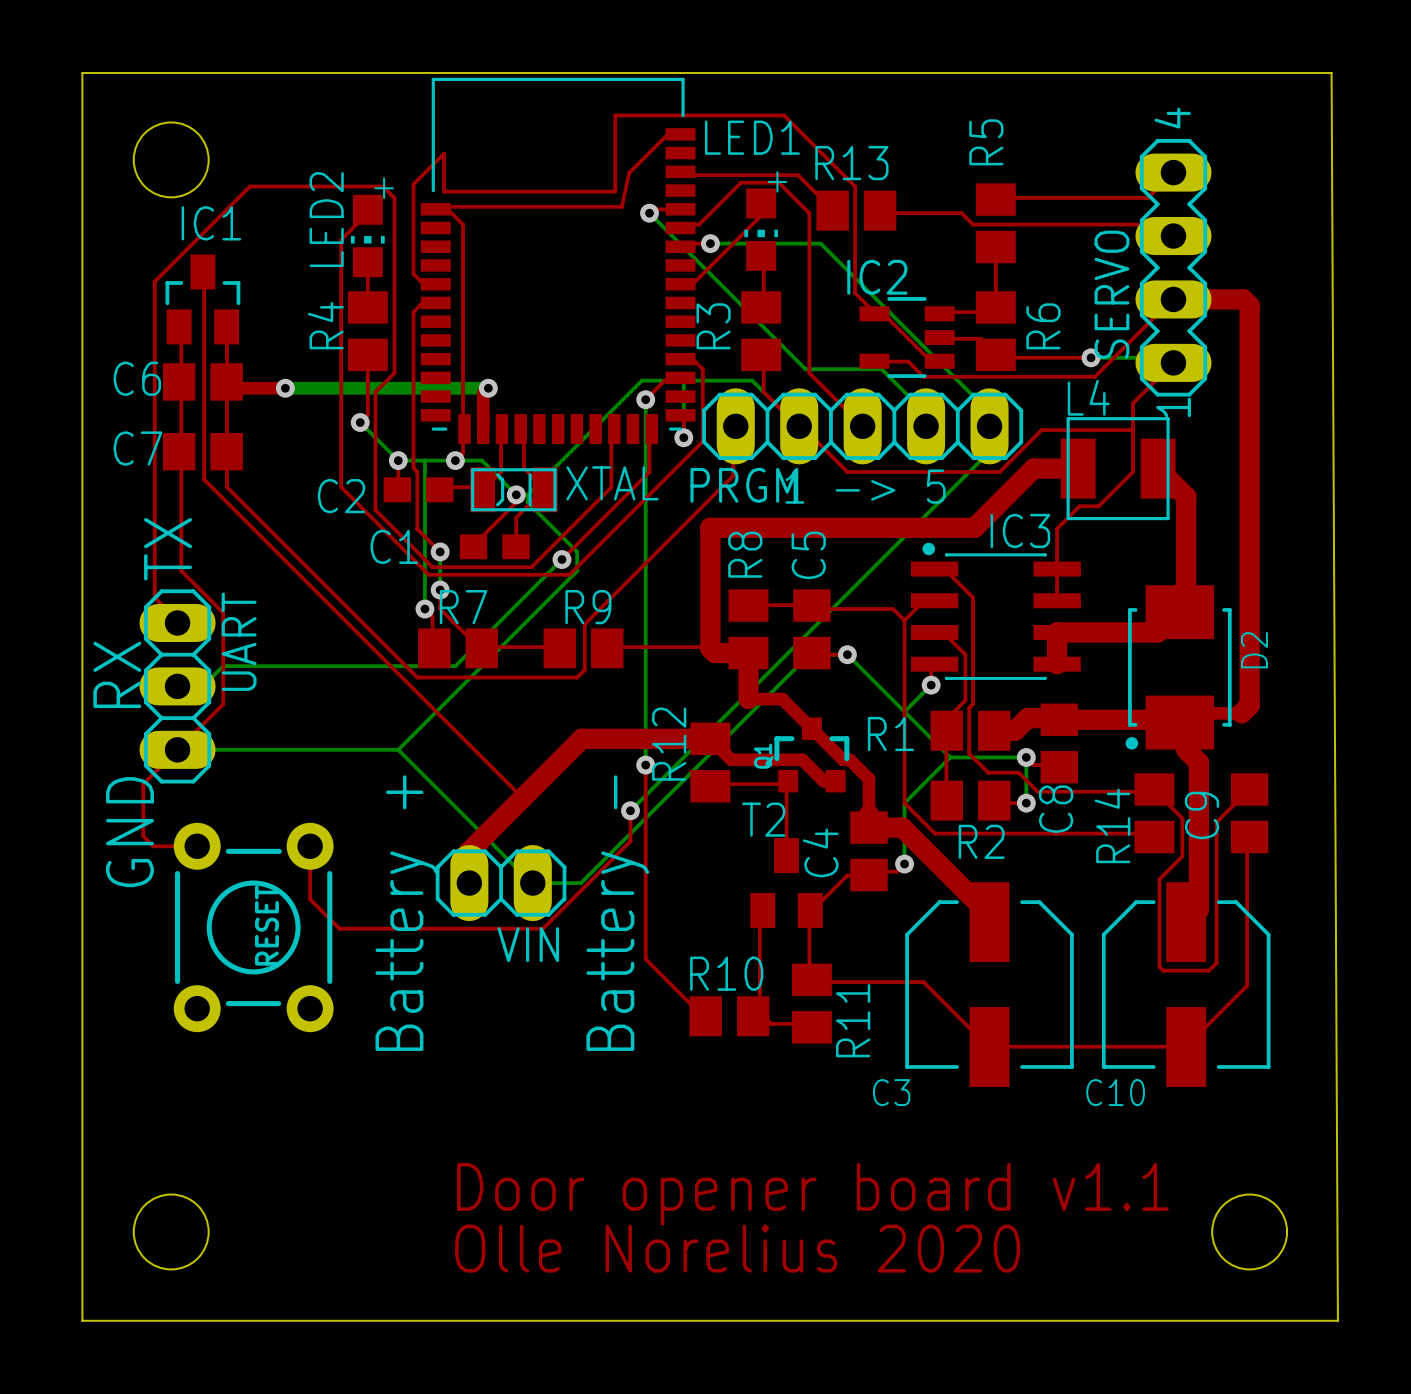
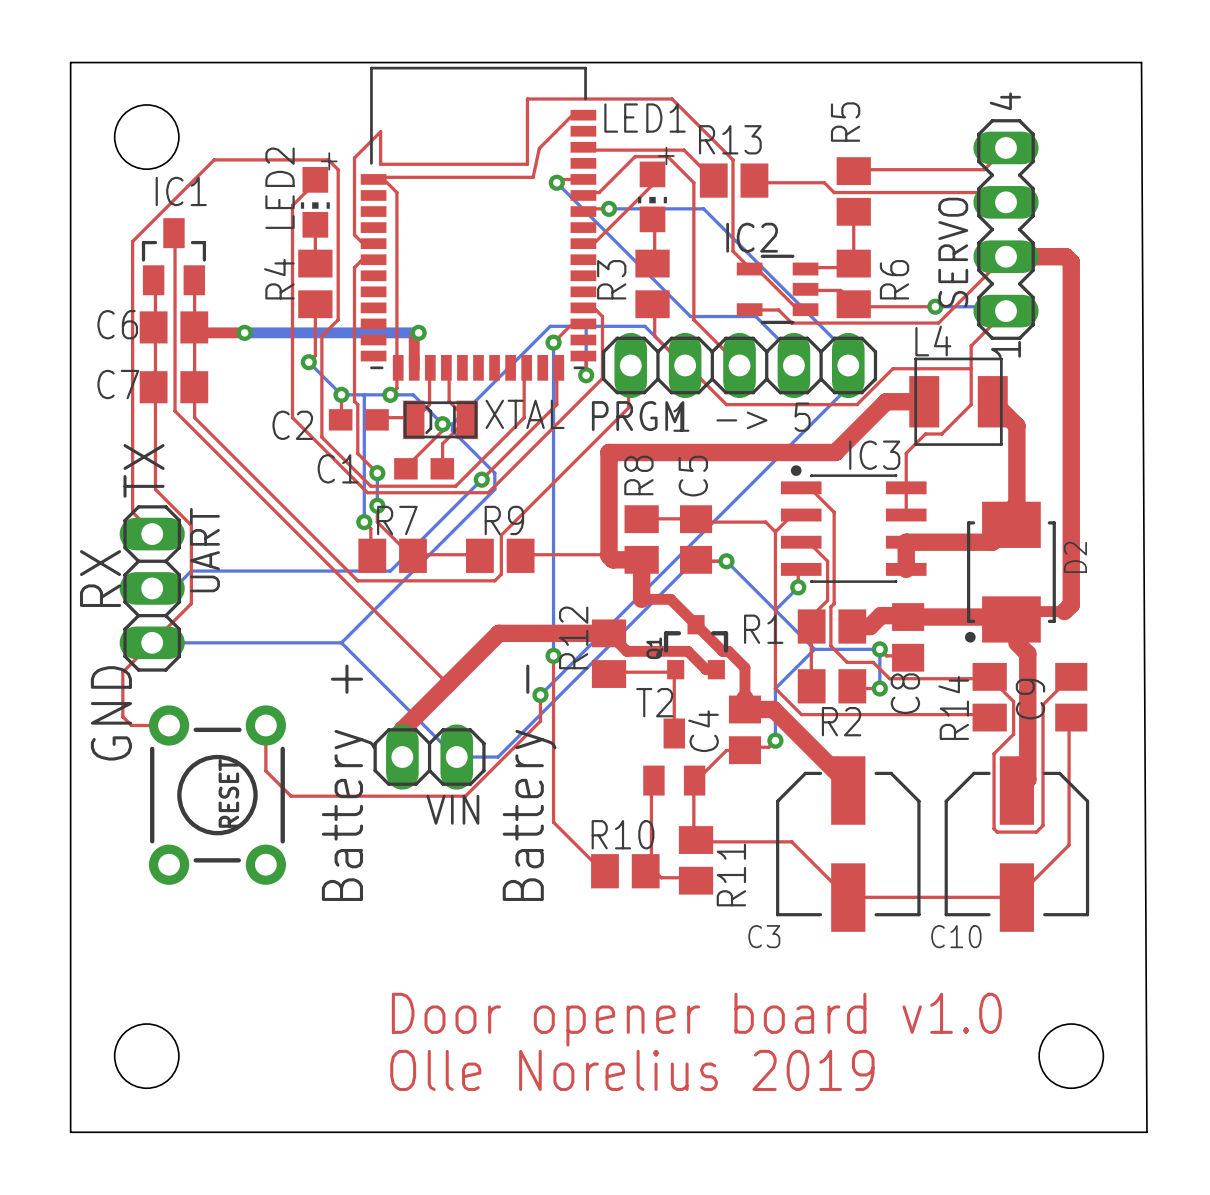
text: Door opener board v1.1 (812, 1194) -> Door opener board v1.0 (696, 1019)
text: Olle Norelius 2020 (737, 1248) -> Olle Norelius 2019 (632, 1070)

